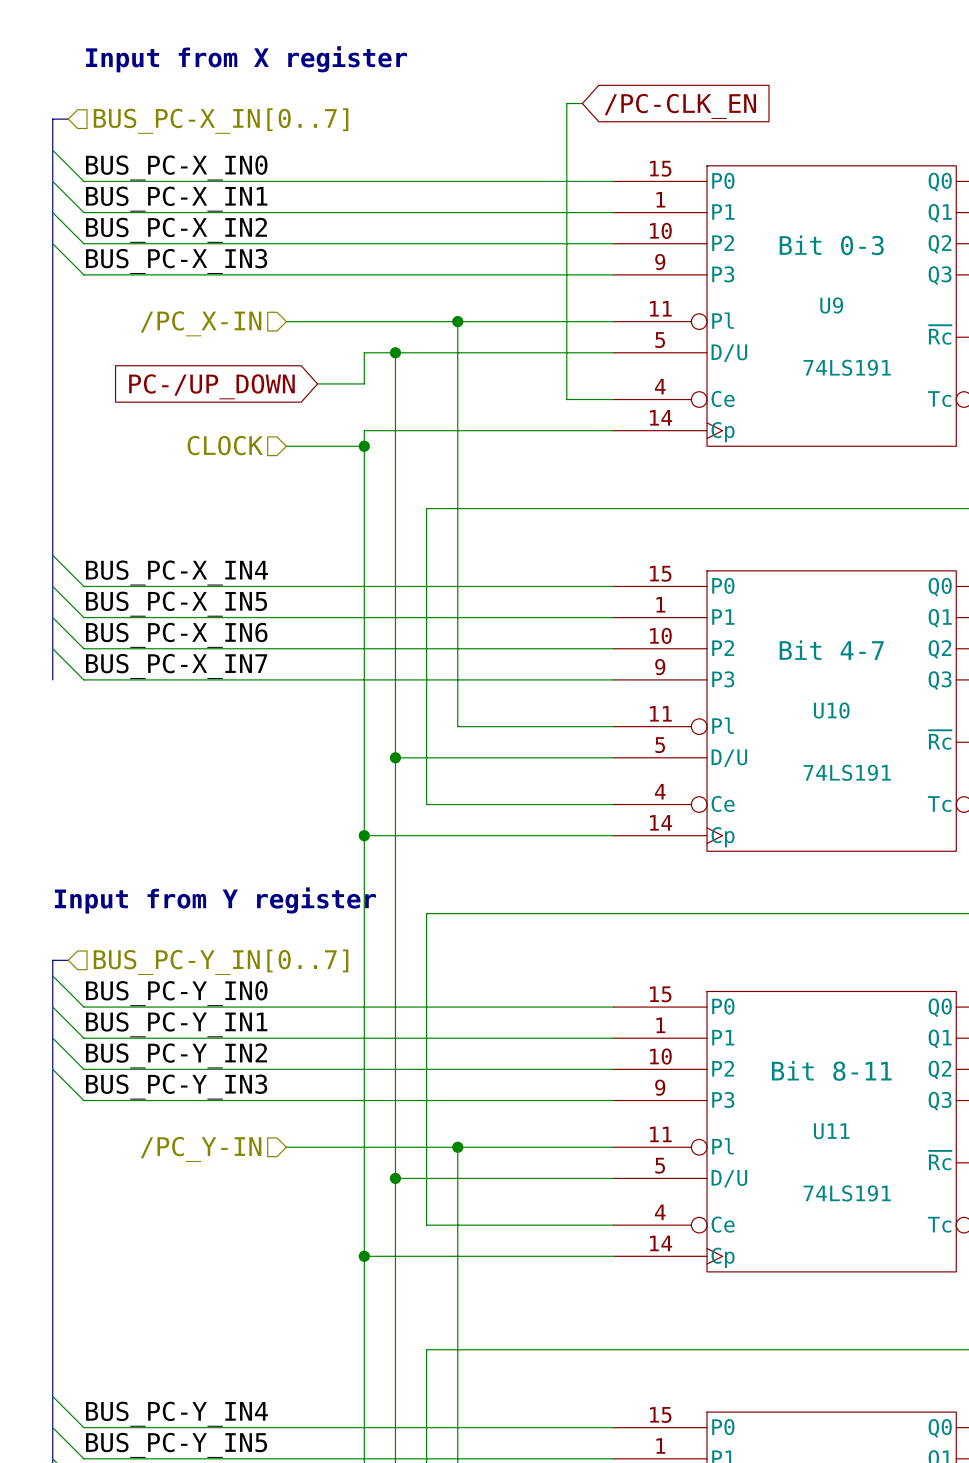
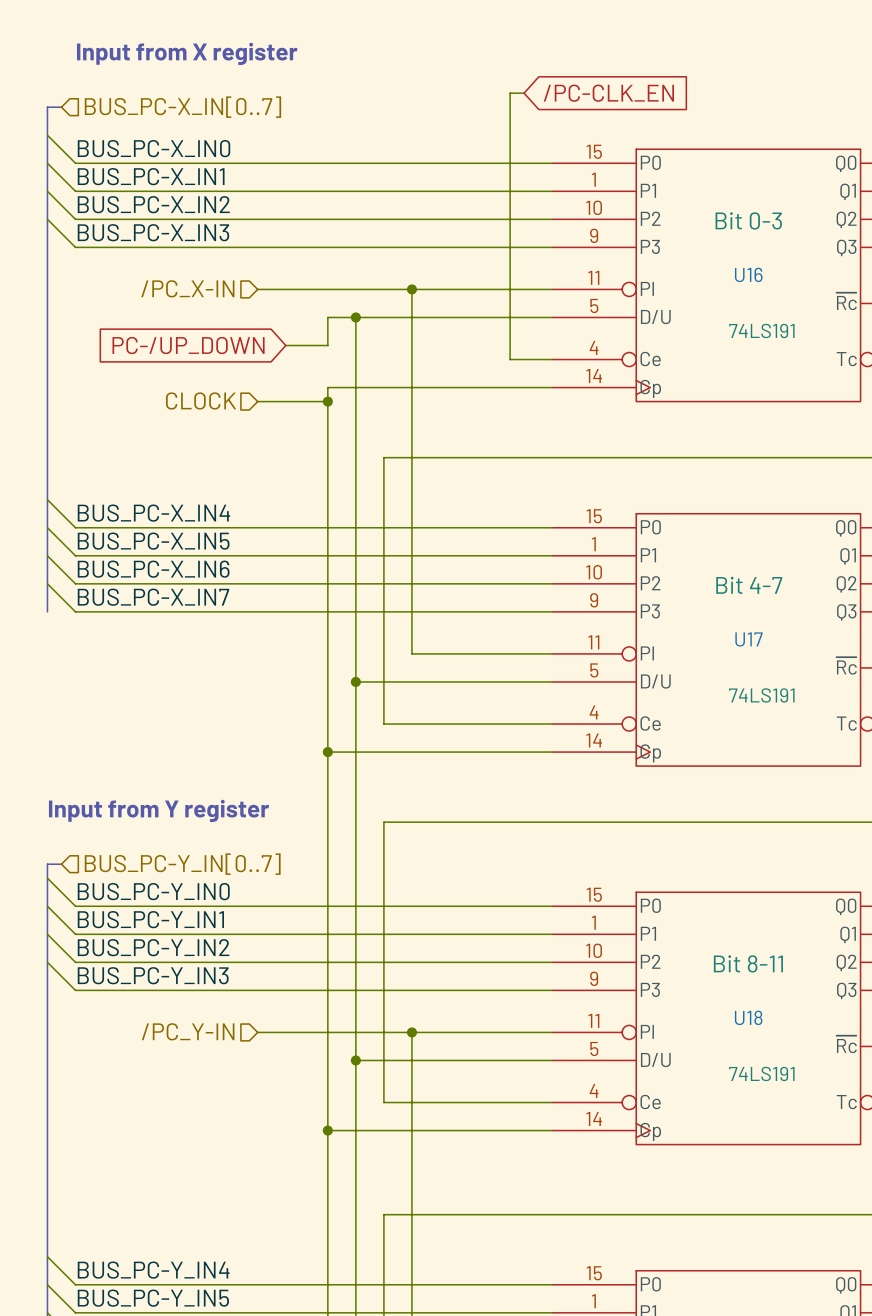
U9 name: U9 (831, 305) -> U16 (748, 274)
U10 name: U10 (831, 710) -> U17 (749, 639)
U11 name: U11 (831, 1131) -> U18 (748, 1017)

